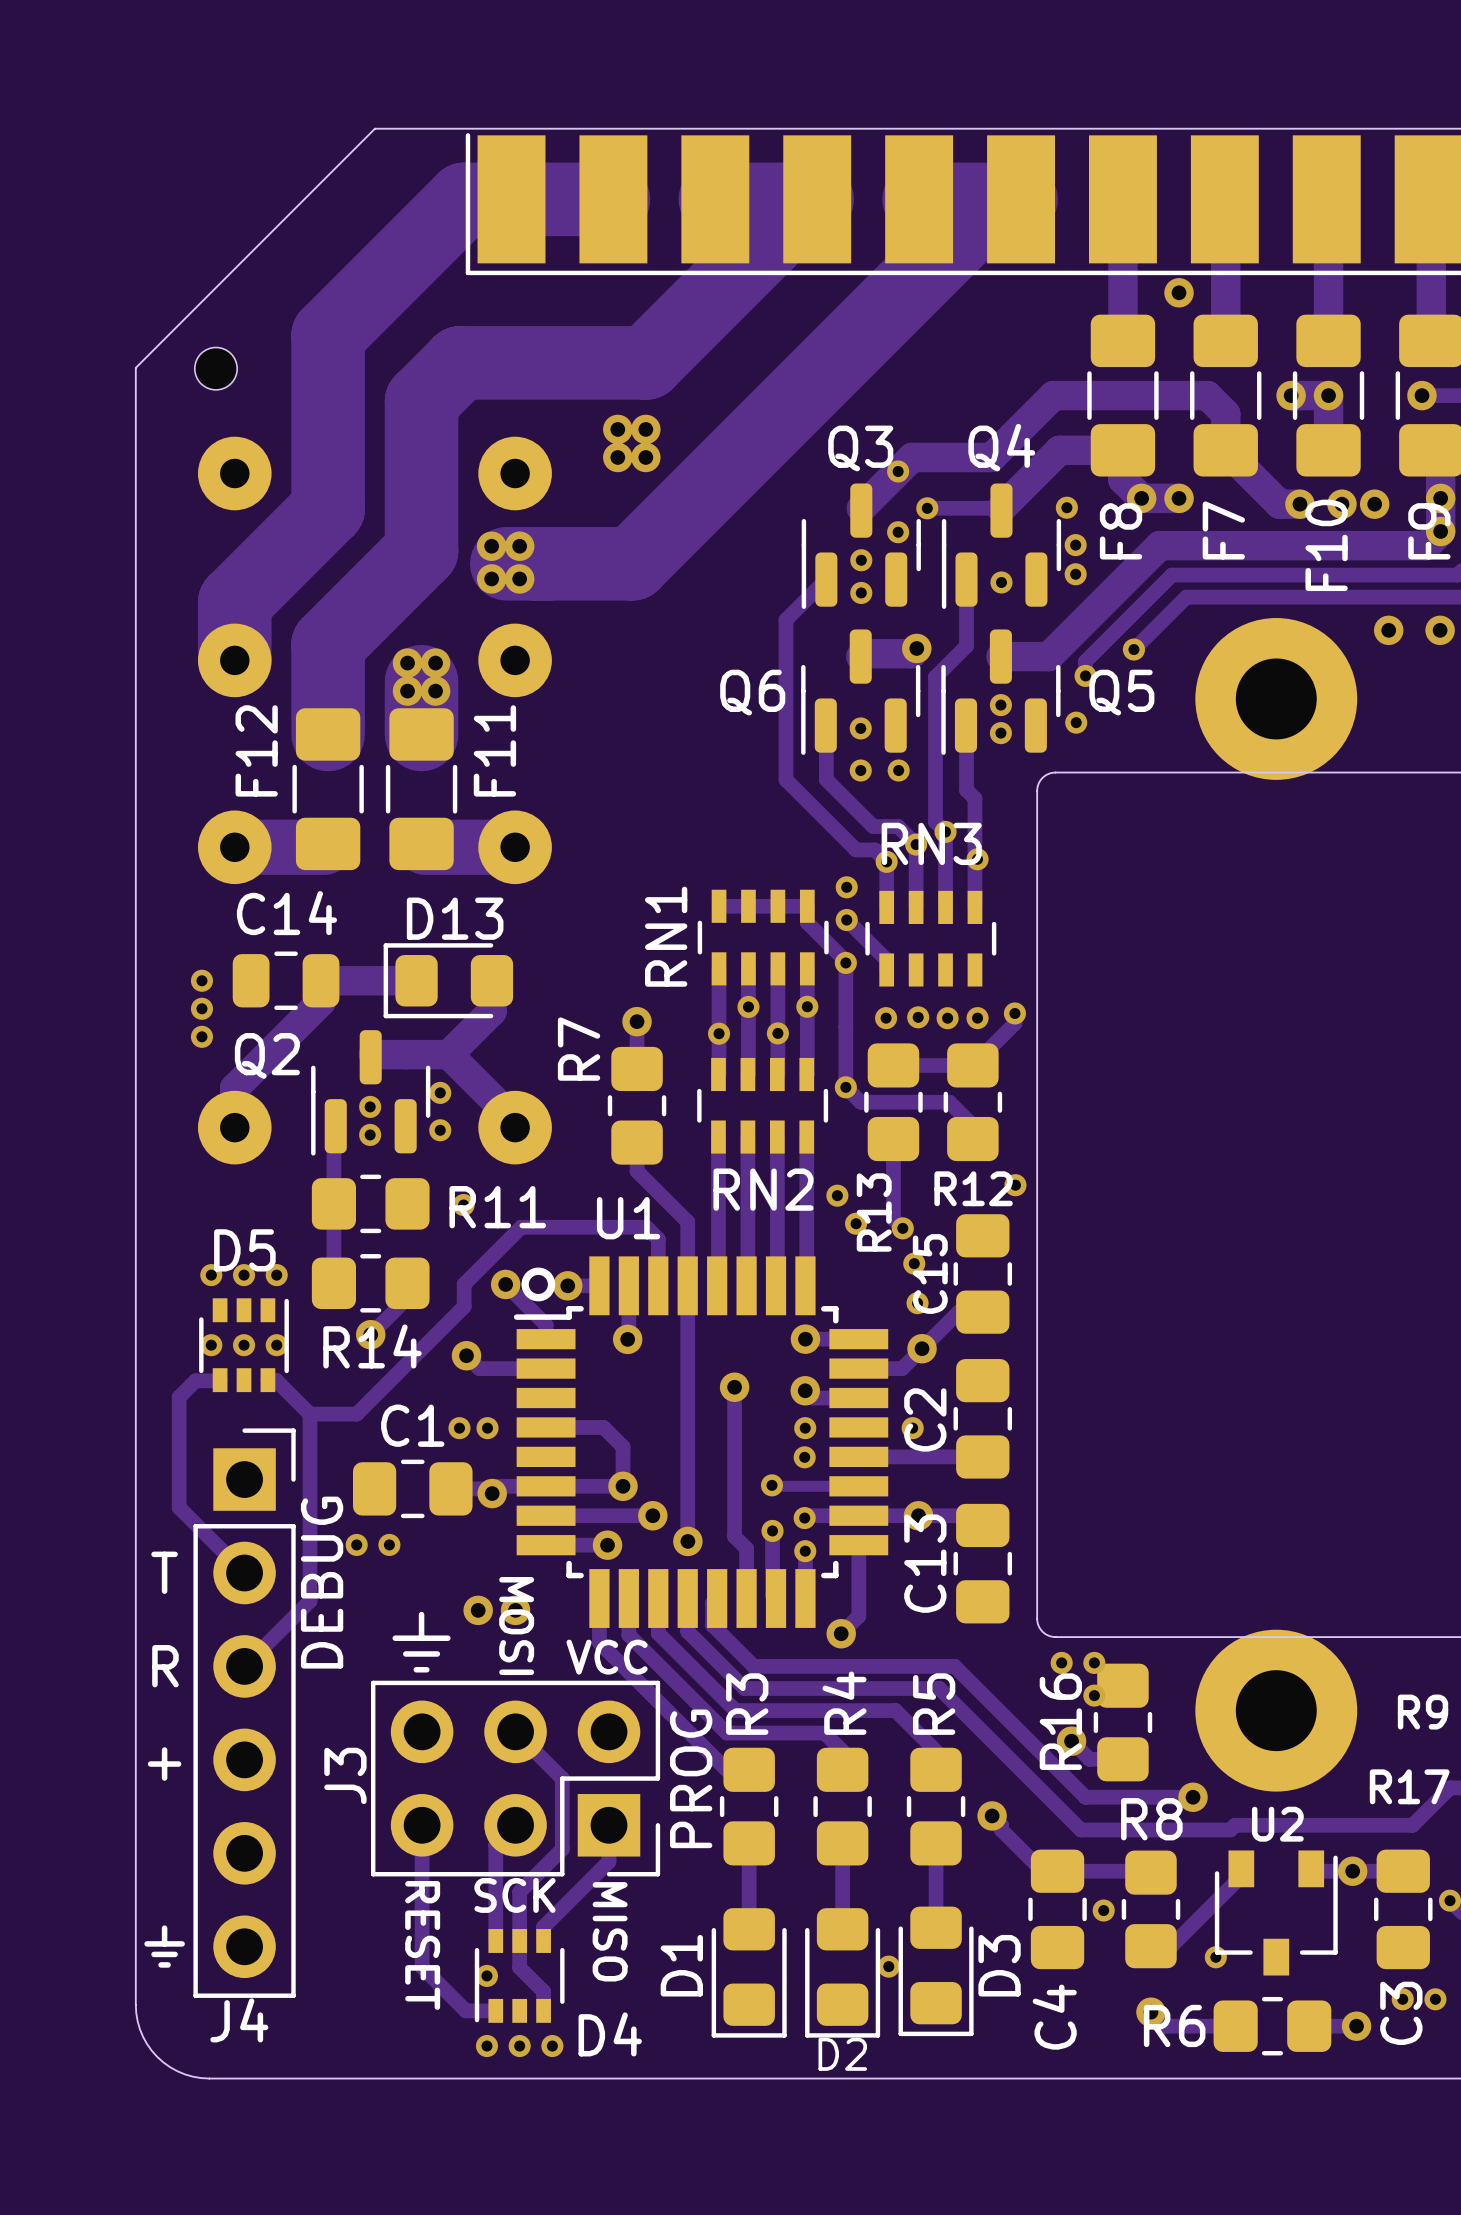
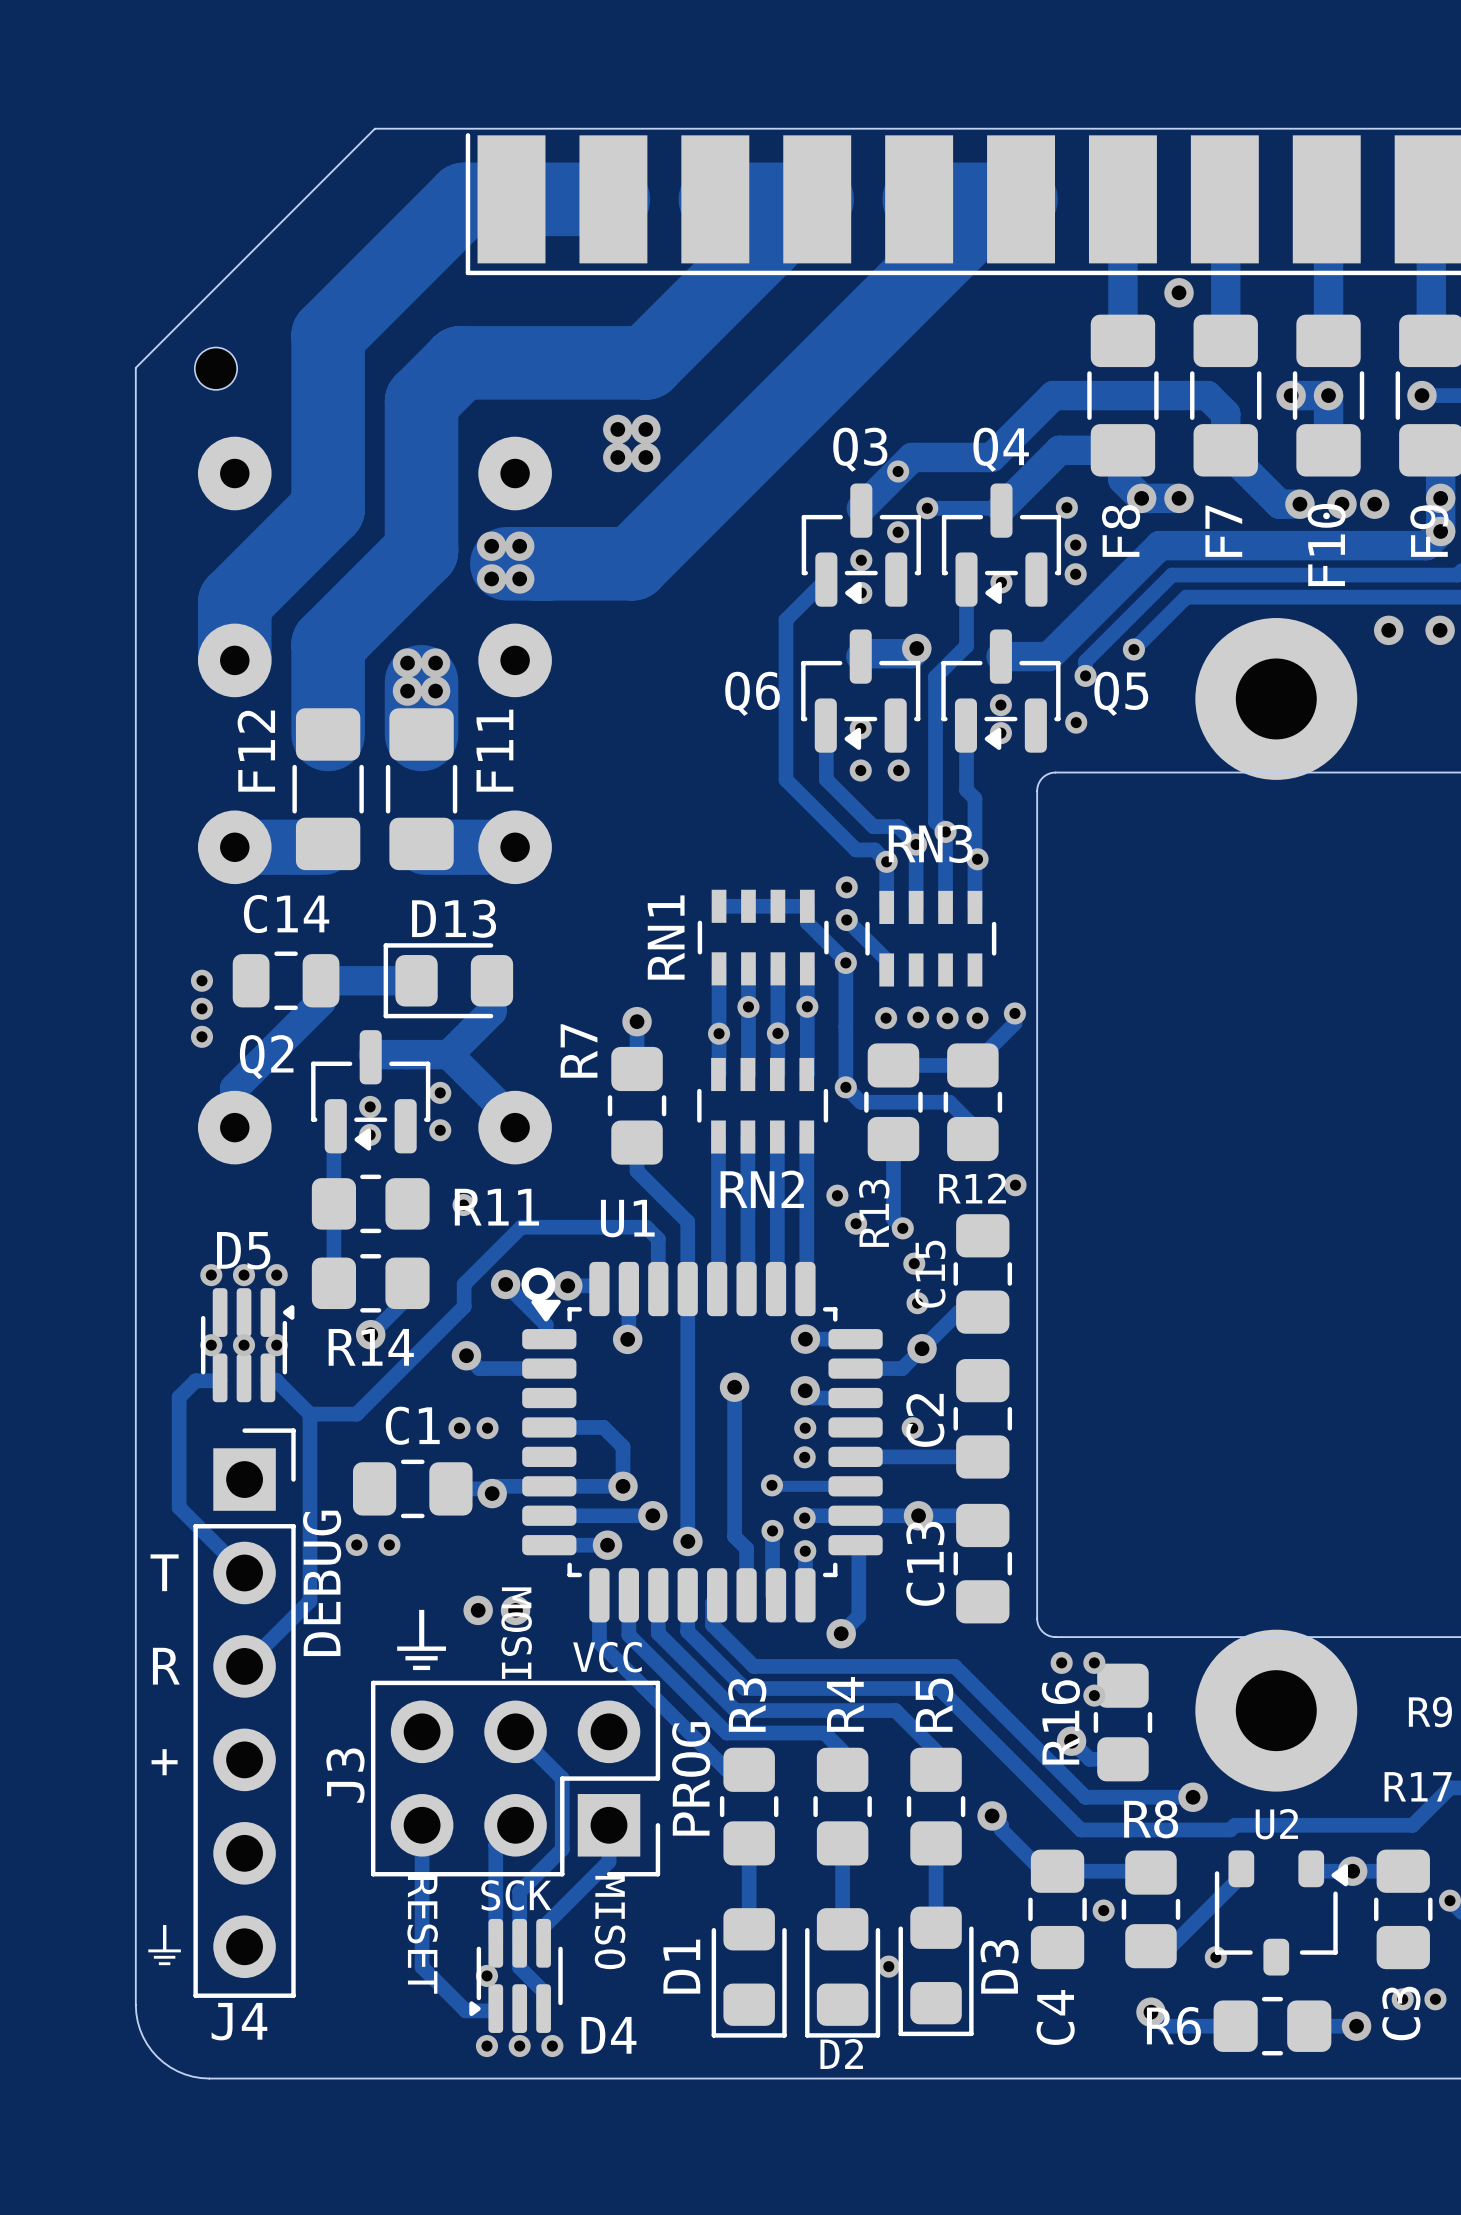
Q3 footprint: [801, 483, 921, 609] -> [801, 483, 921, 607]
Q4 footprint: [941, 483, 1062, 609] -> [941, 483, 1062, 607]
Q6 footprint: [801, 629, 921, 755] -> [801, 629, 921, 753]
Q5 footprint: [941, 629, 1061, 755] -> [941, 629, 1061, 753]
Q2 footprint: [311, 1030, 431, 1156] -> [311, 1030, 431, 1154]
U1 footprint: [513, 1256, 889, 1628] -> [522, 1261, 883, 1623]
D5 footprint: [199, 1298, 289, 1393] -> [200, 1288, 295, 1403]
U2 footprint: [1214, 1850, 1338, 1976] -> [1214, 1850, 1349, 1976]
D4 footprint: [474, 1929, 565, 2023] -> [469, 1918, 563, 2033]

